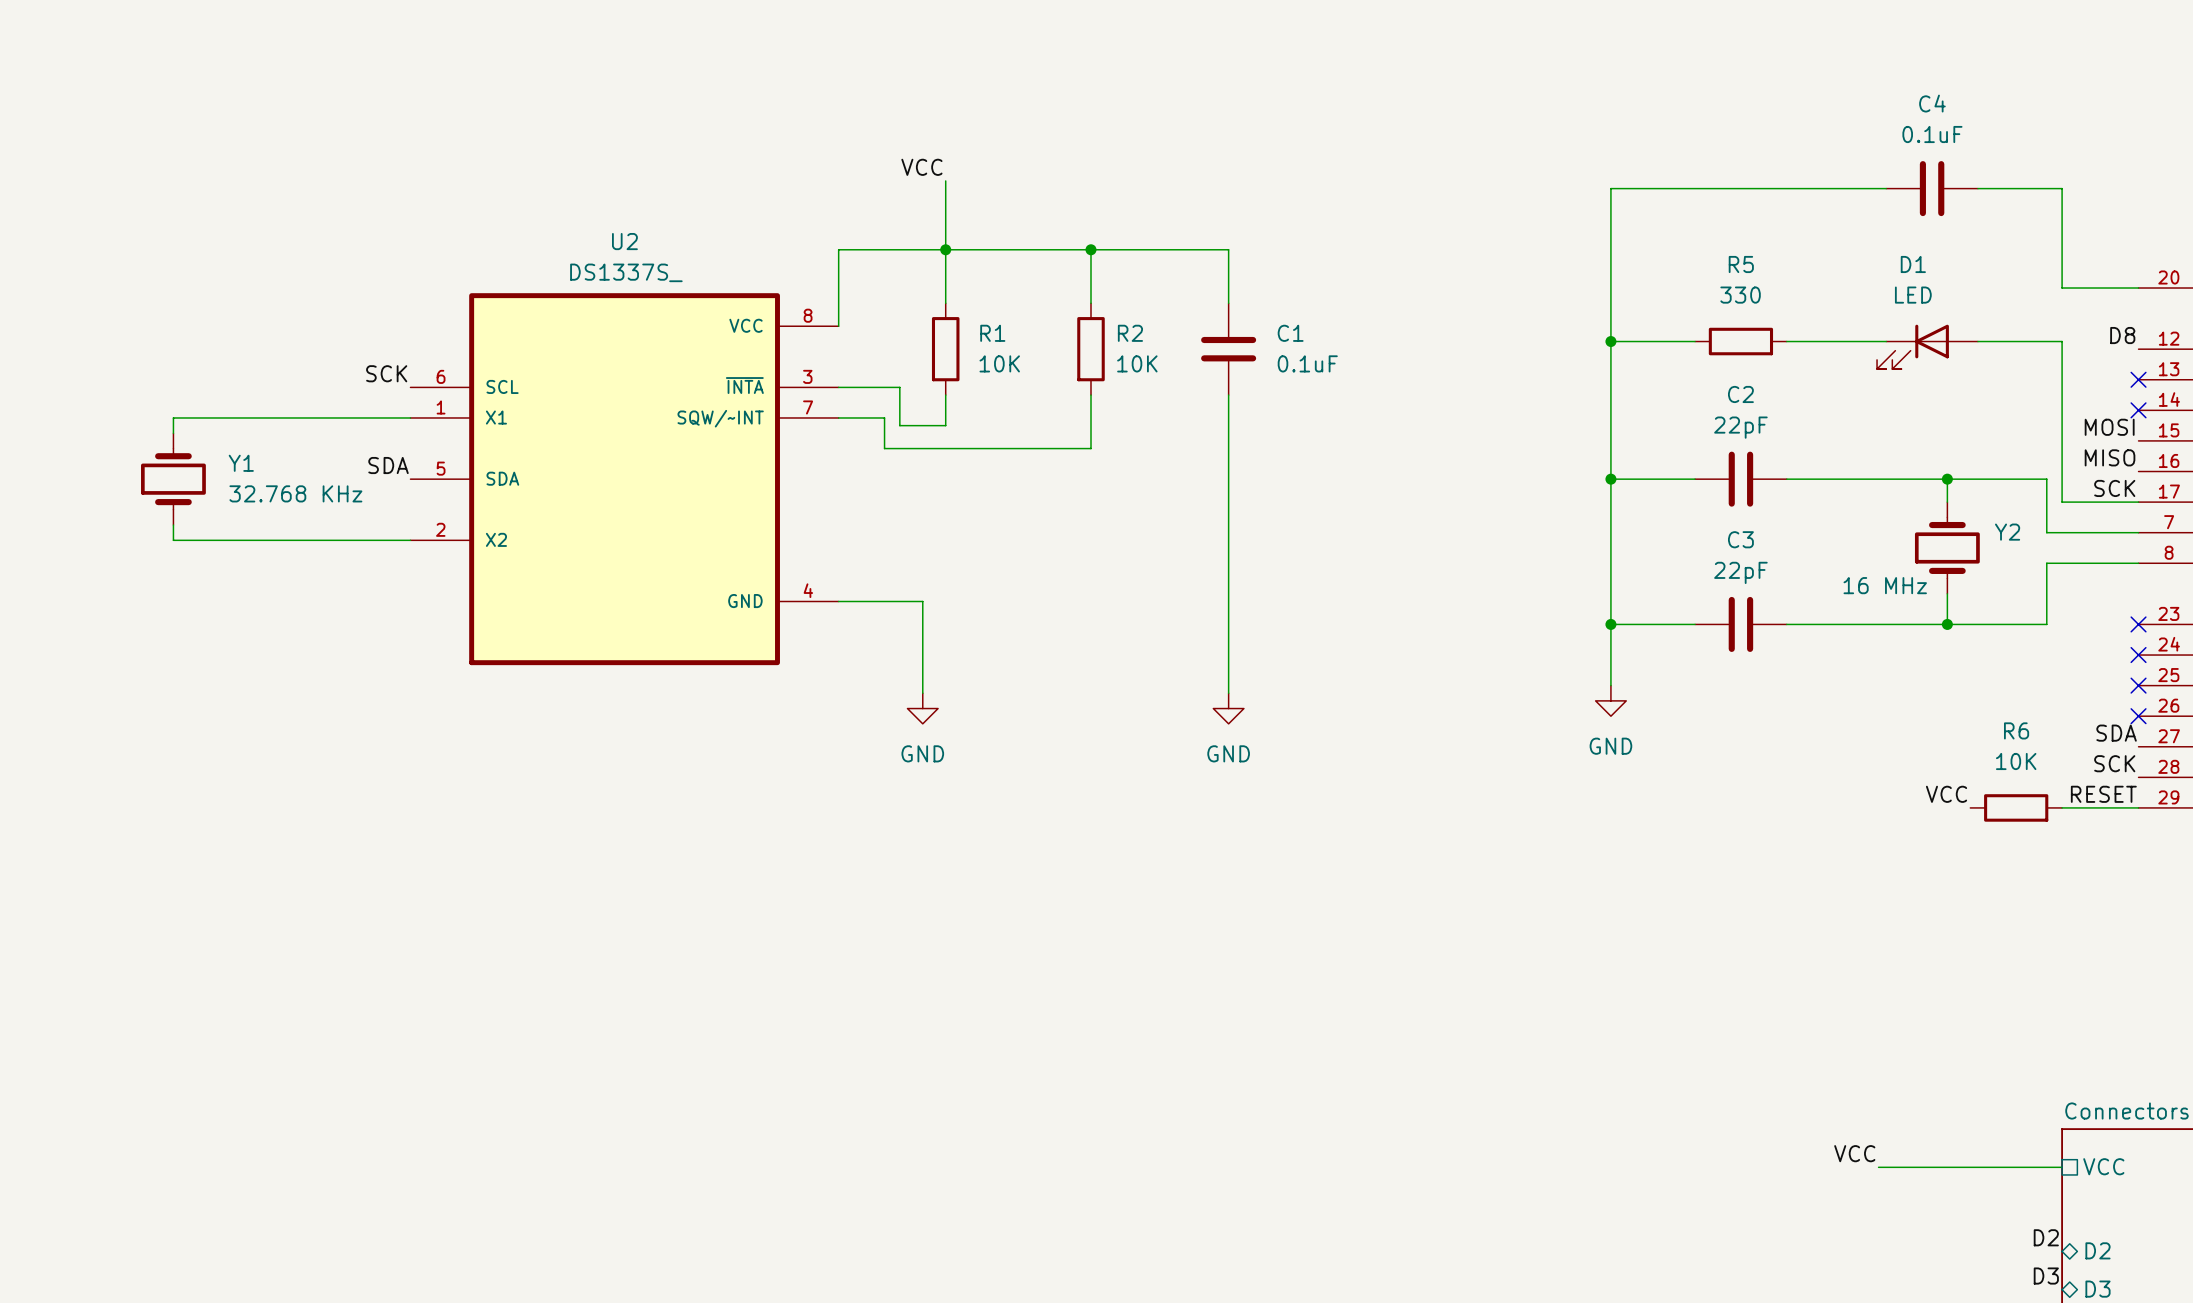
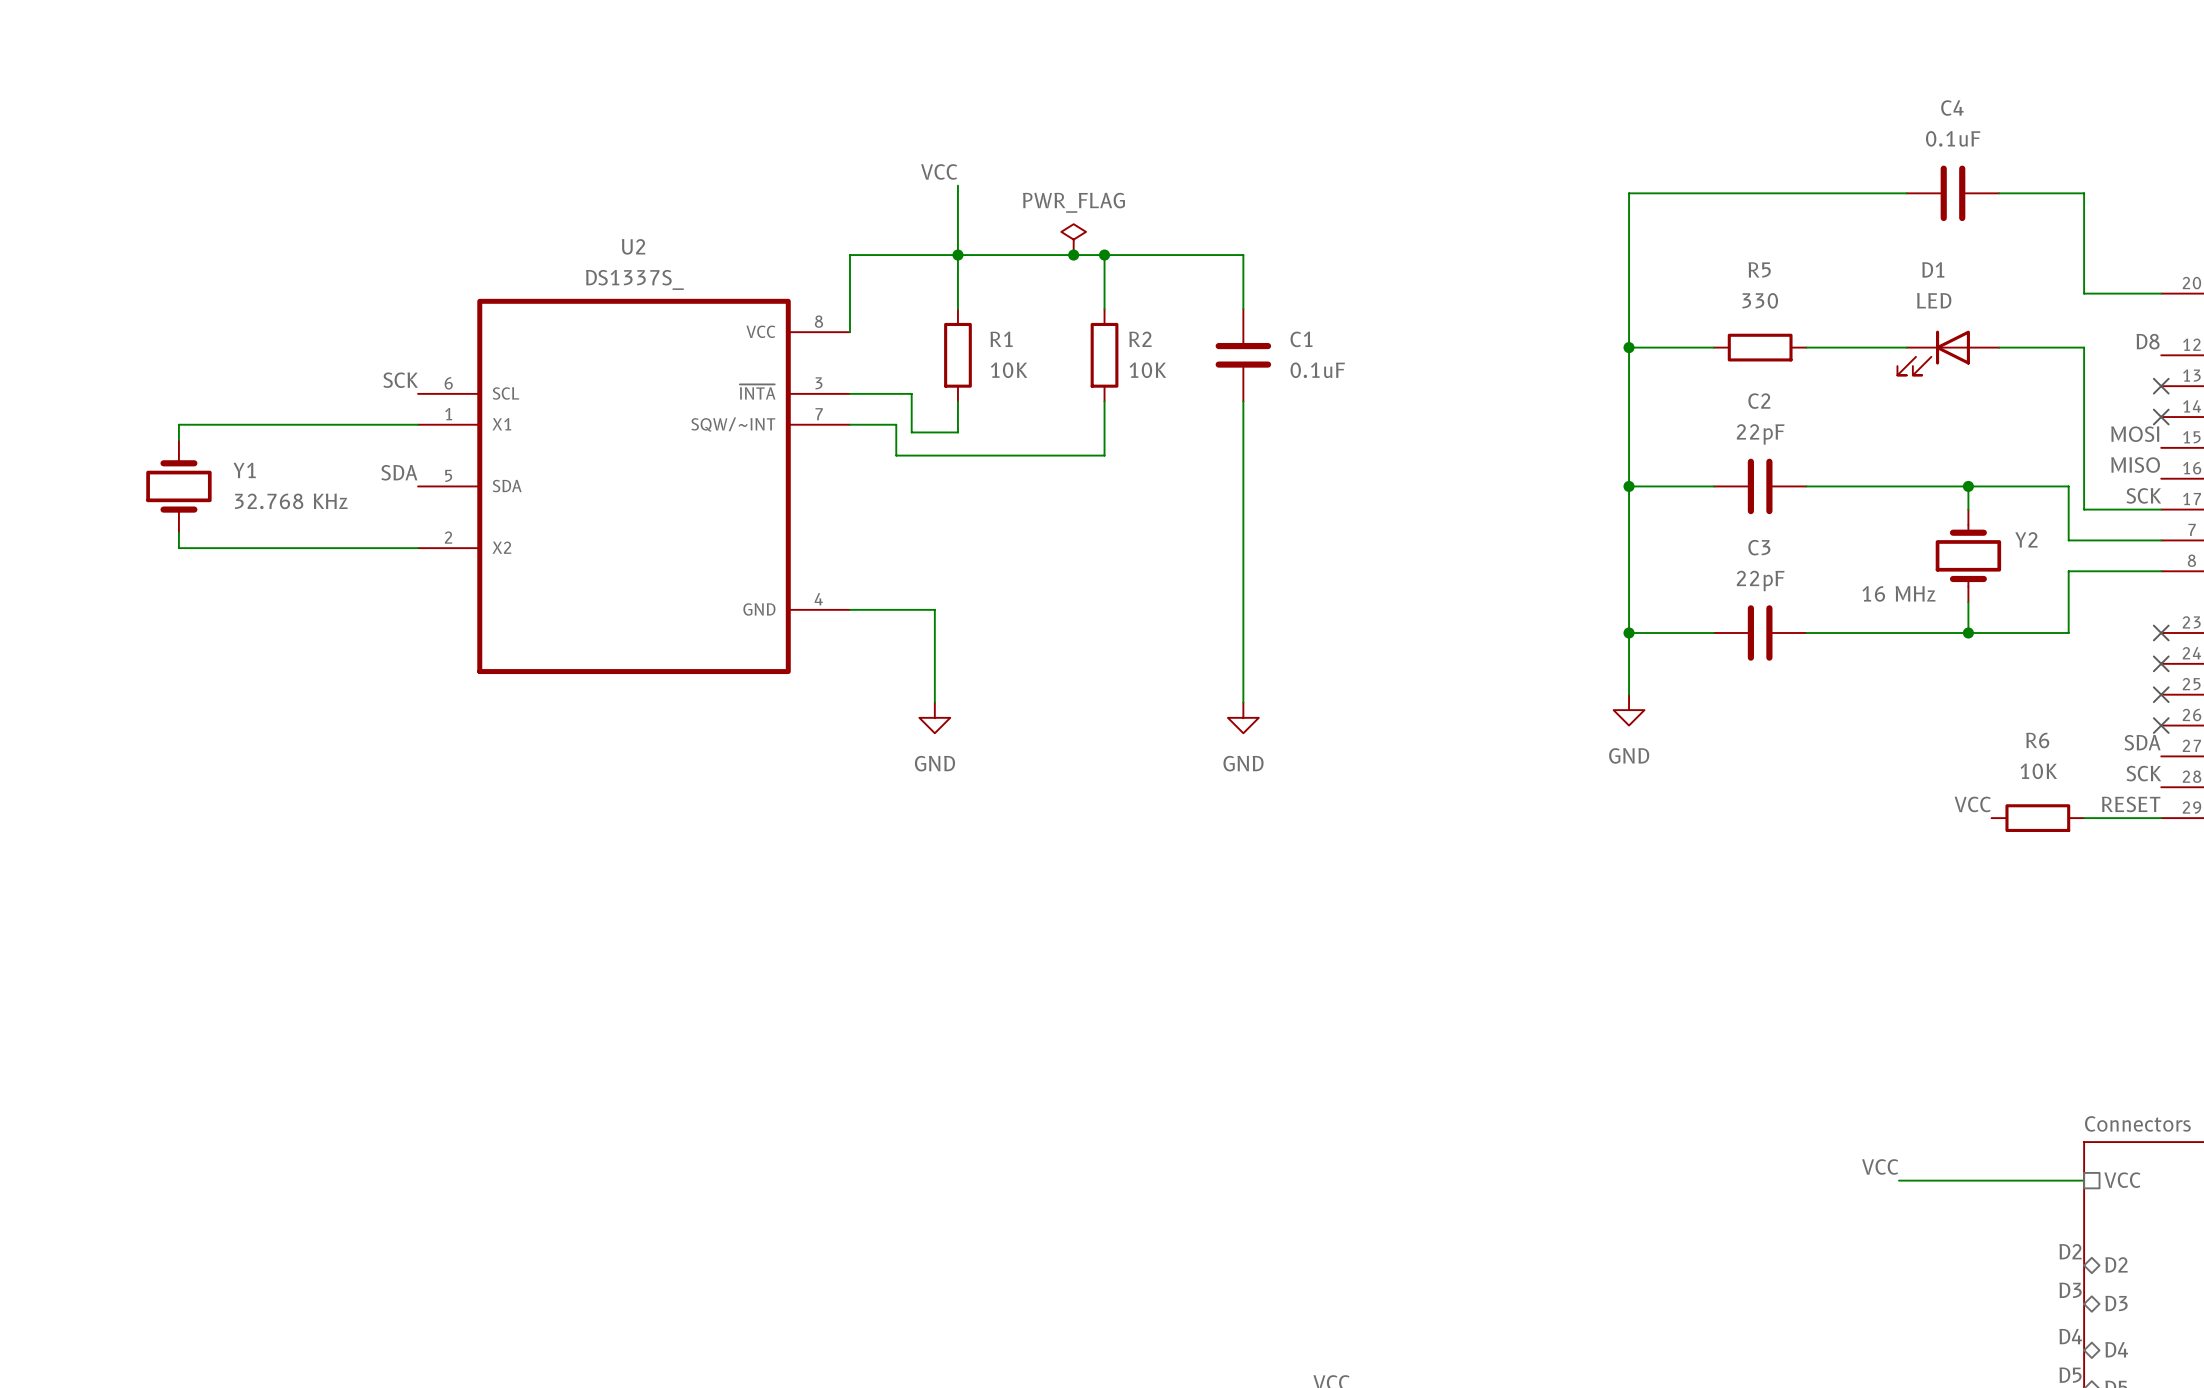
power symbol: none -> PWR_FLAG (1073, 239)
junction: none -> (1073, 255)

